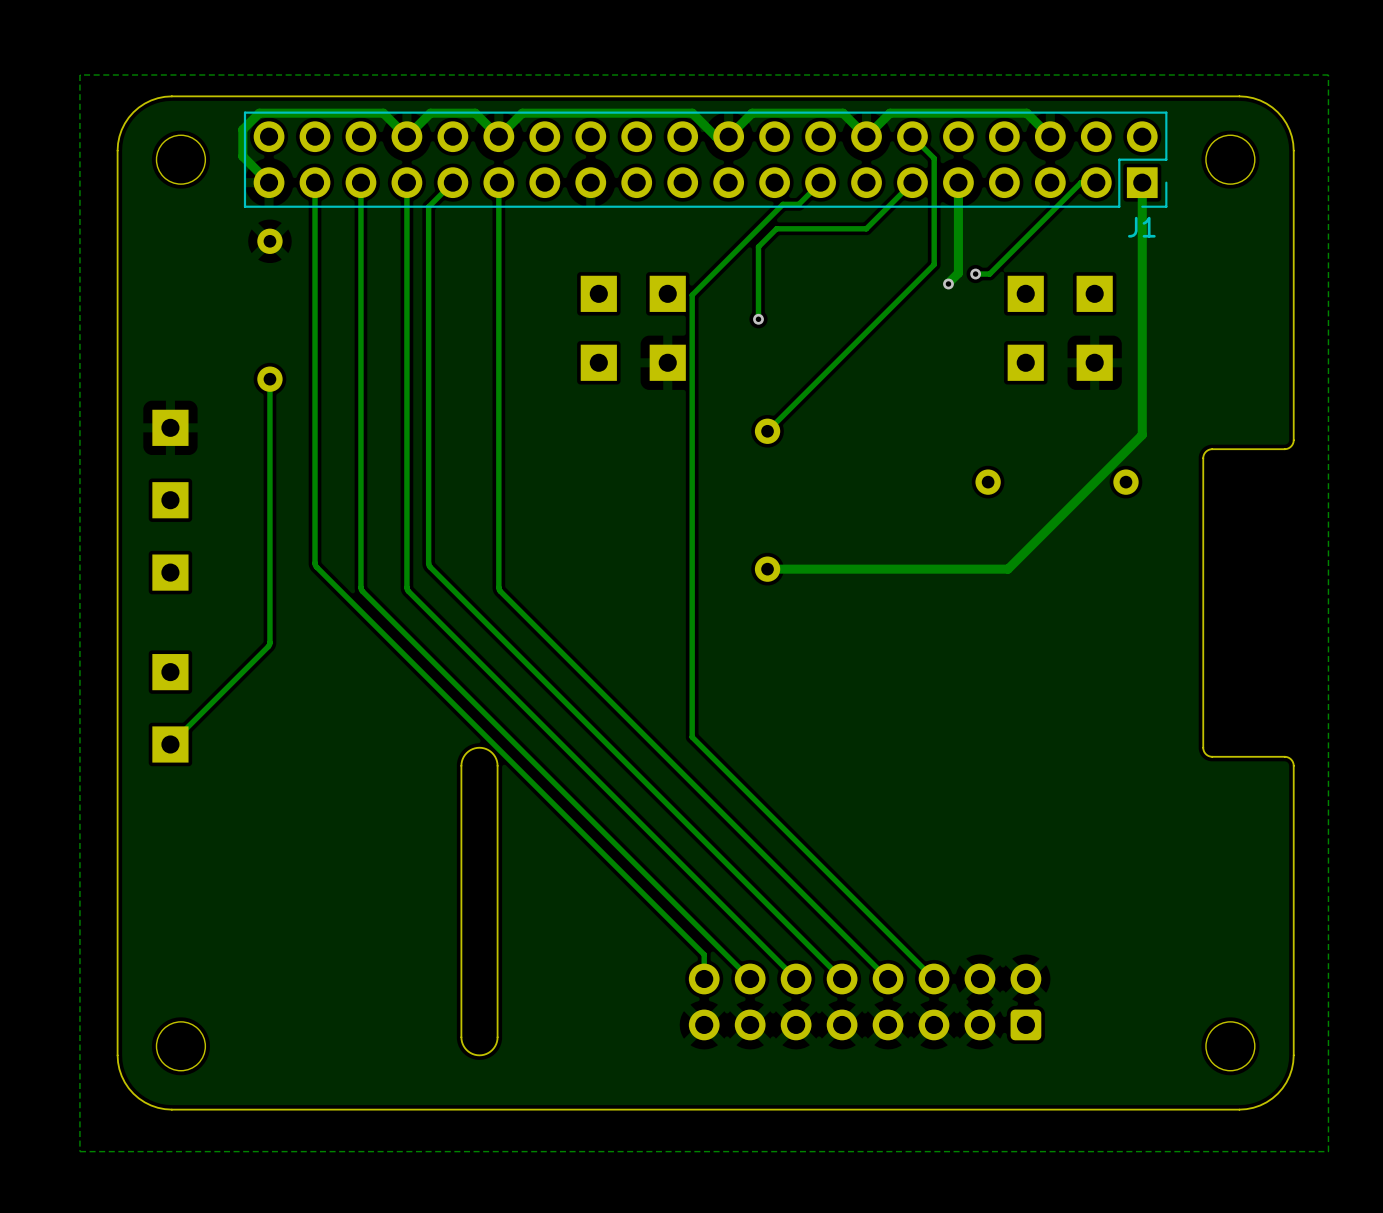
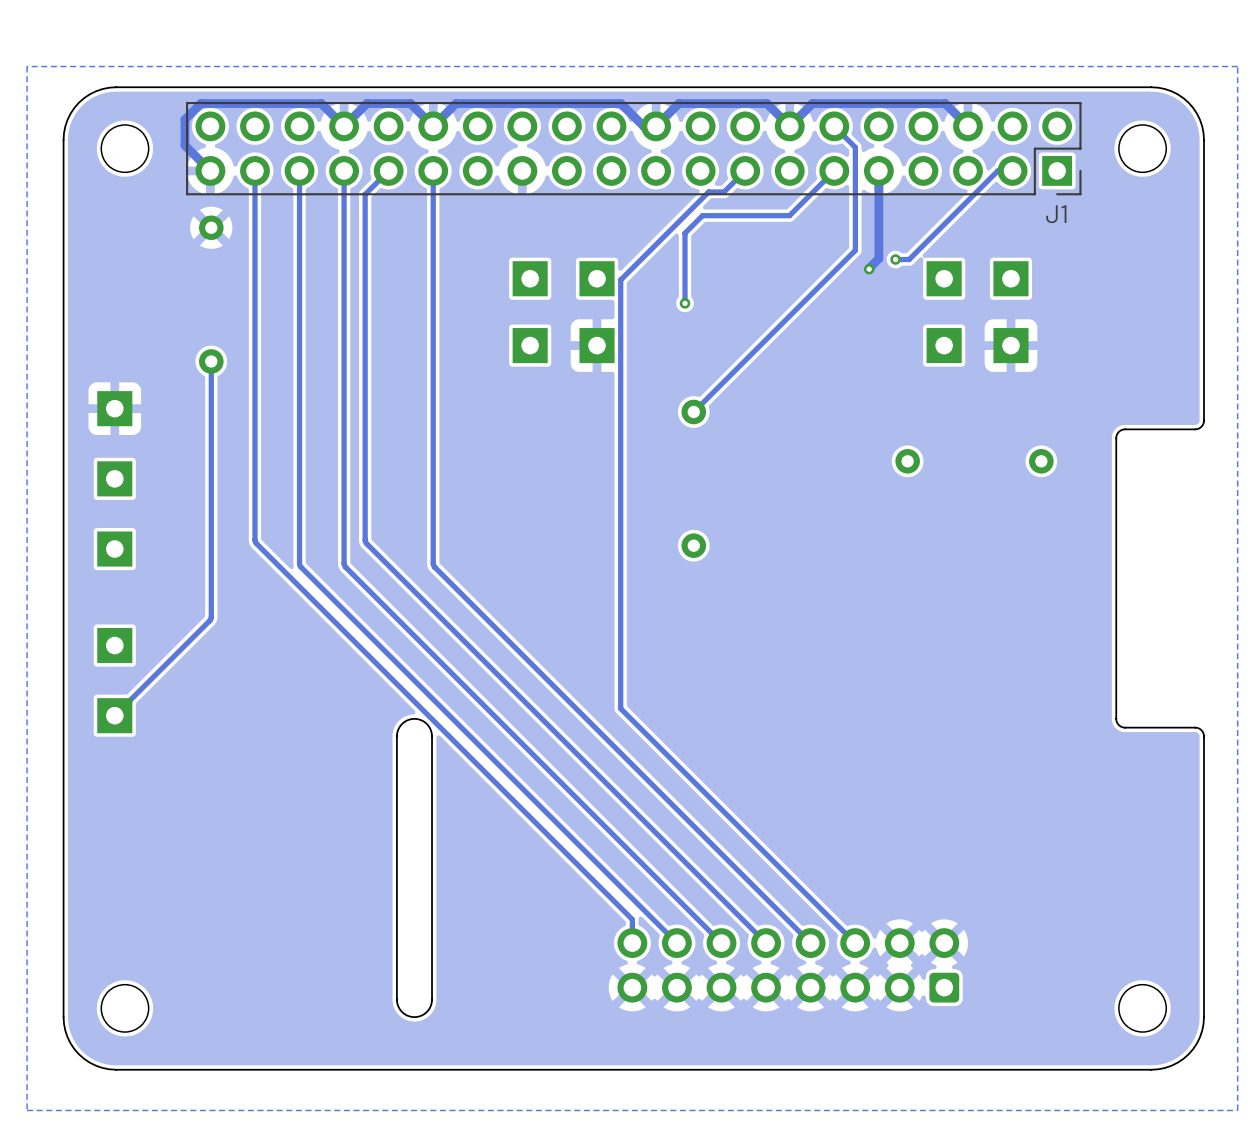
track: (1142, 182) (1142, 434) (1008, 569) (767, 569) -> none

